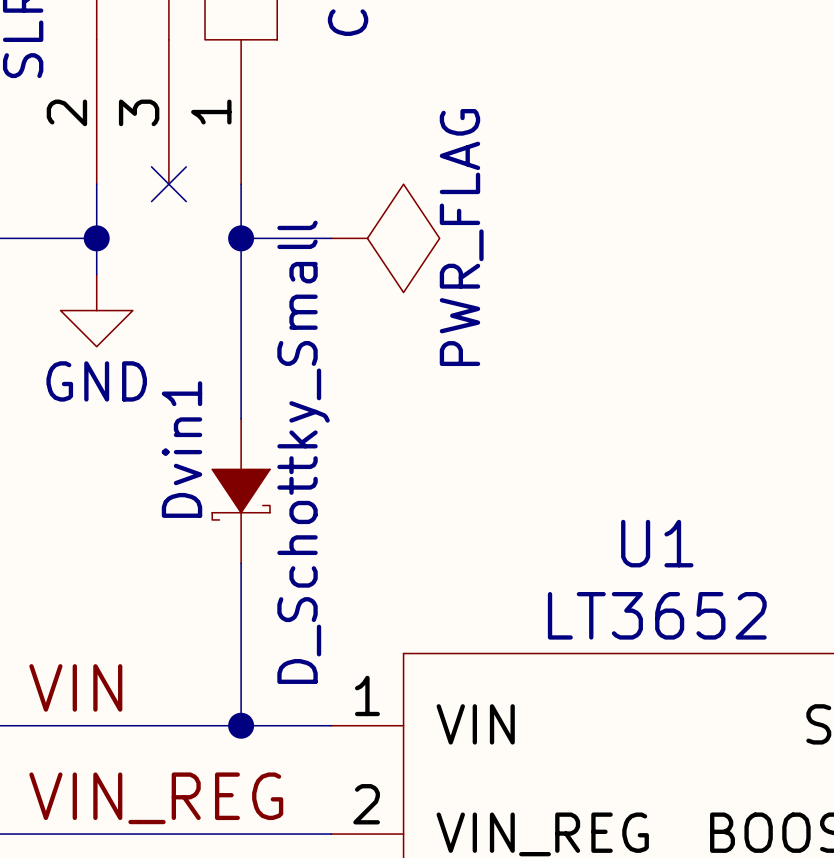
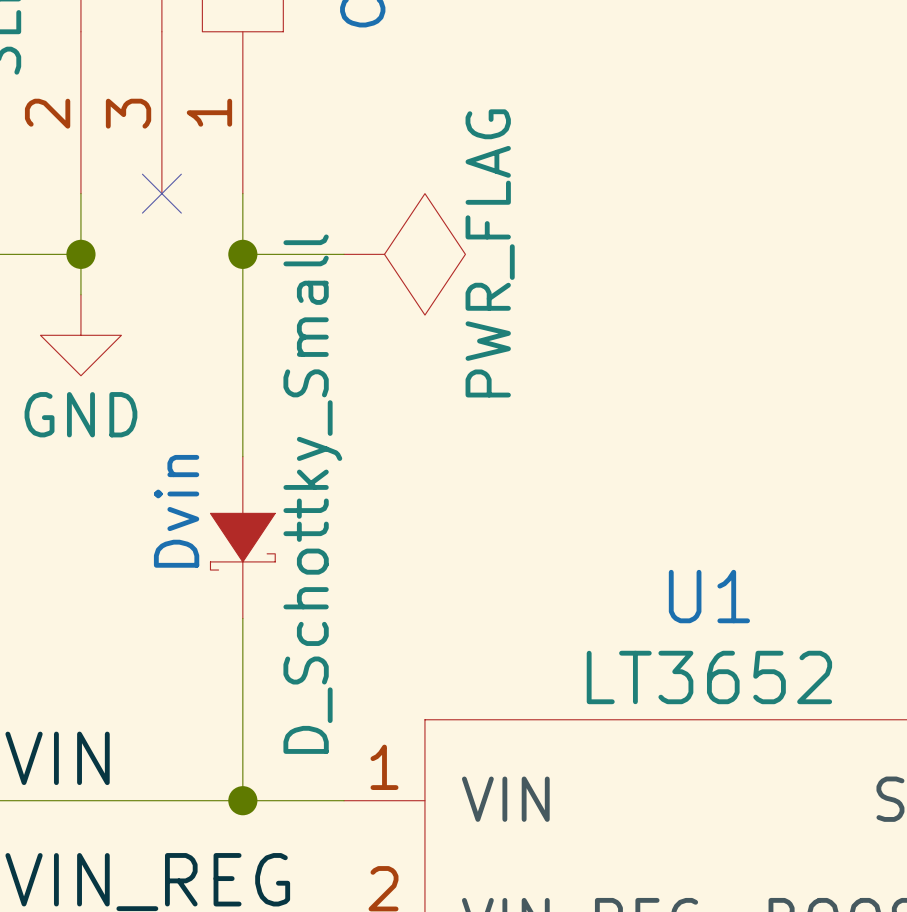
Dvin1 name: Dvin1 (182, 449) -> Dvin (176, 511)

